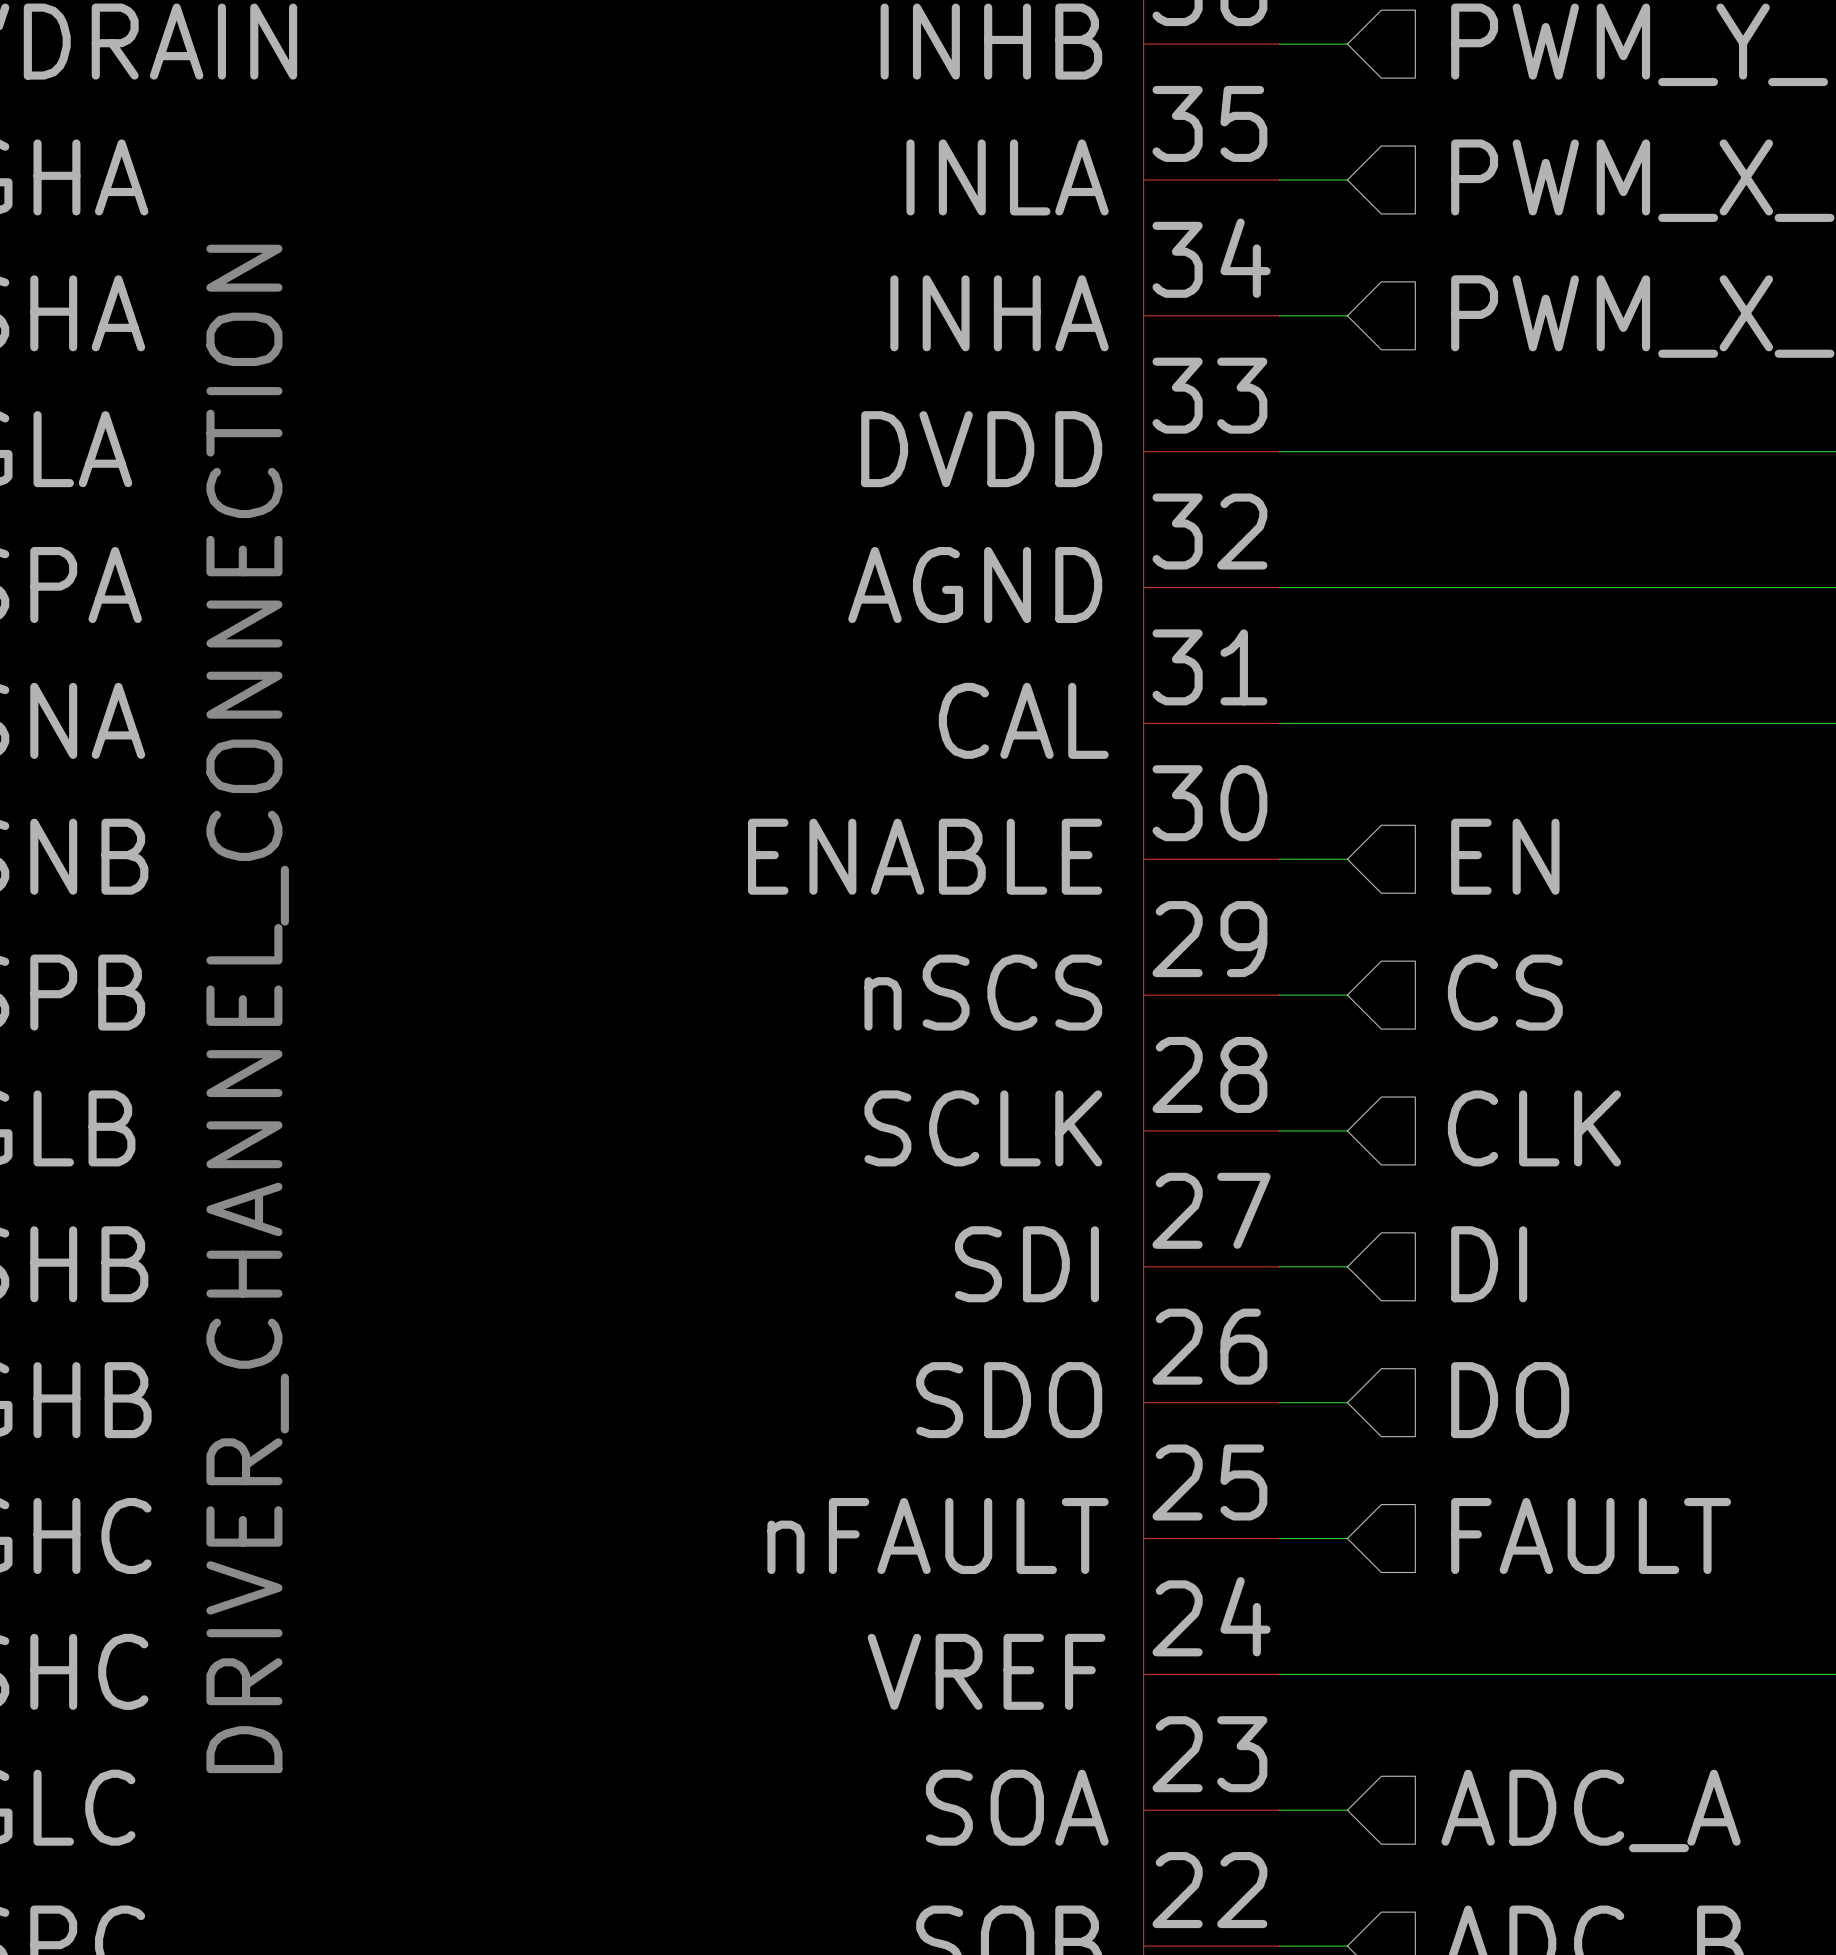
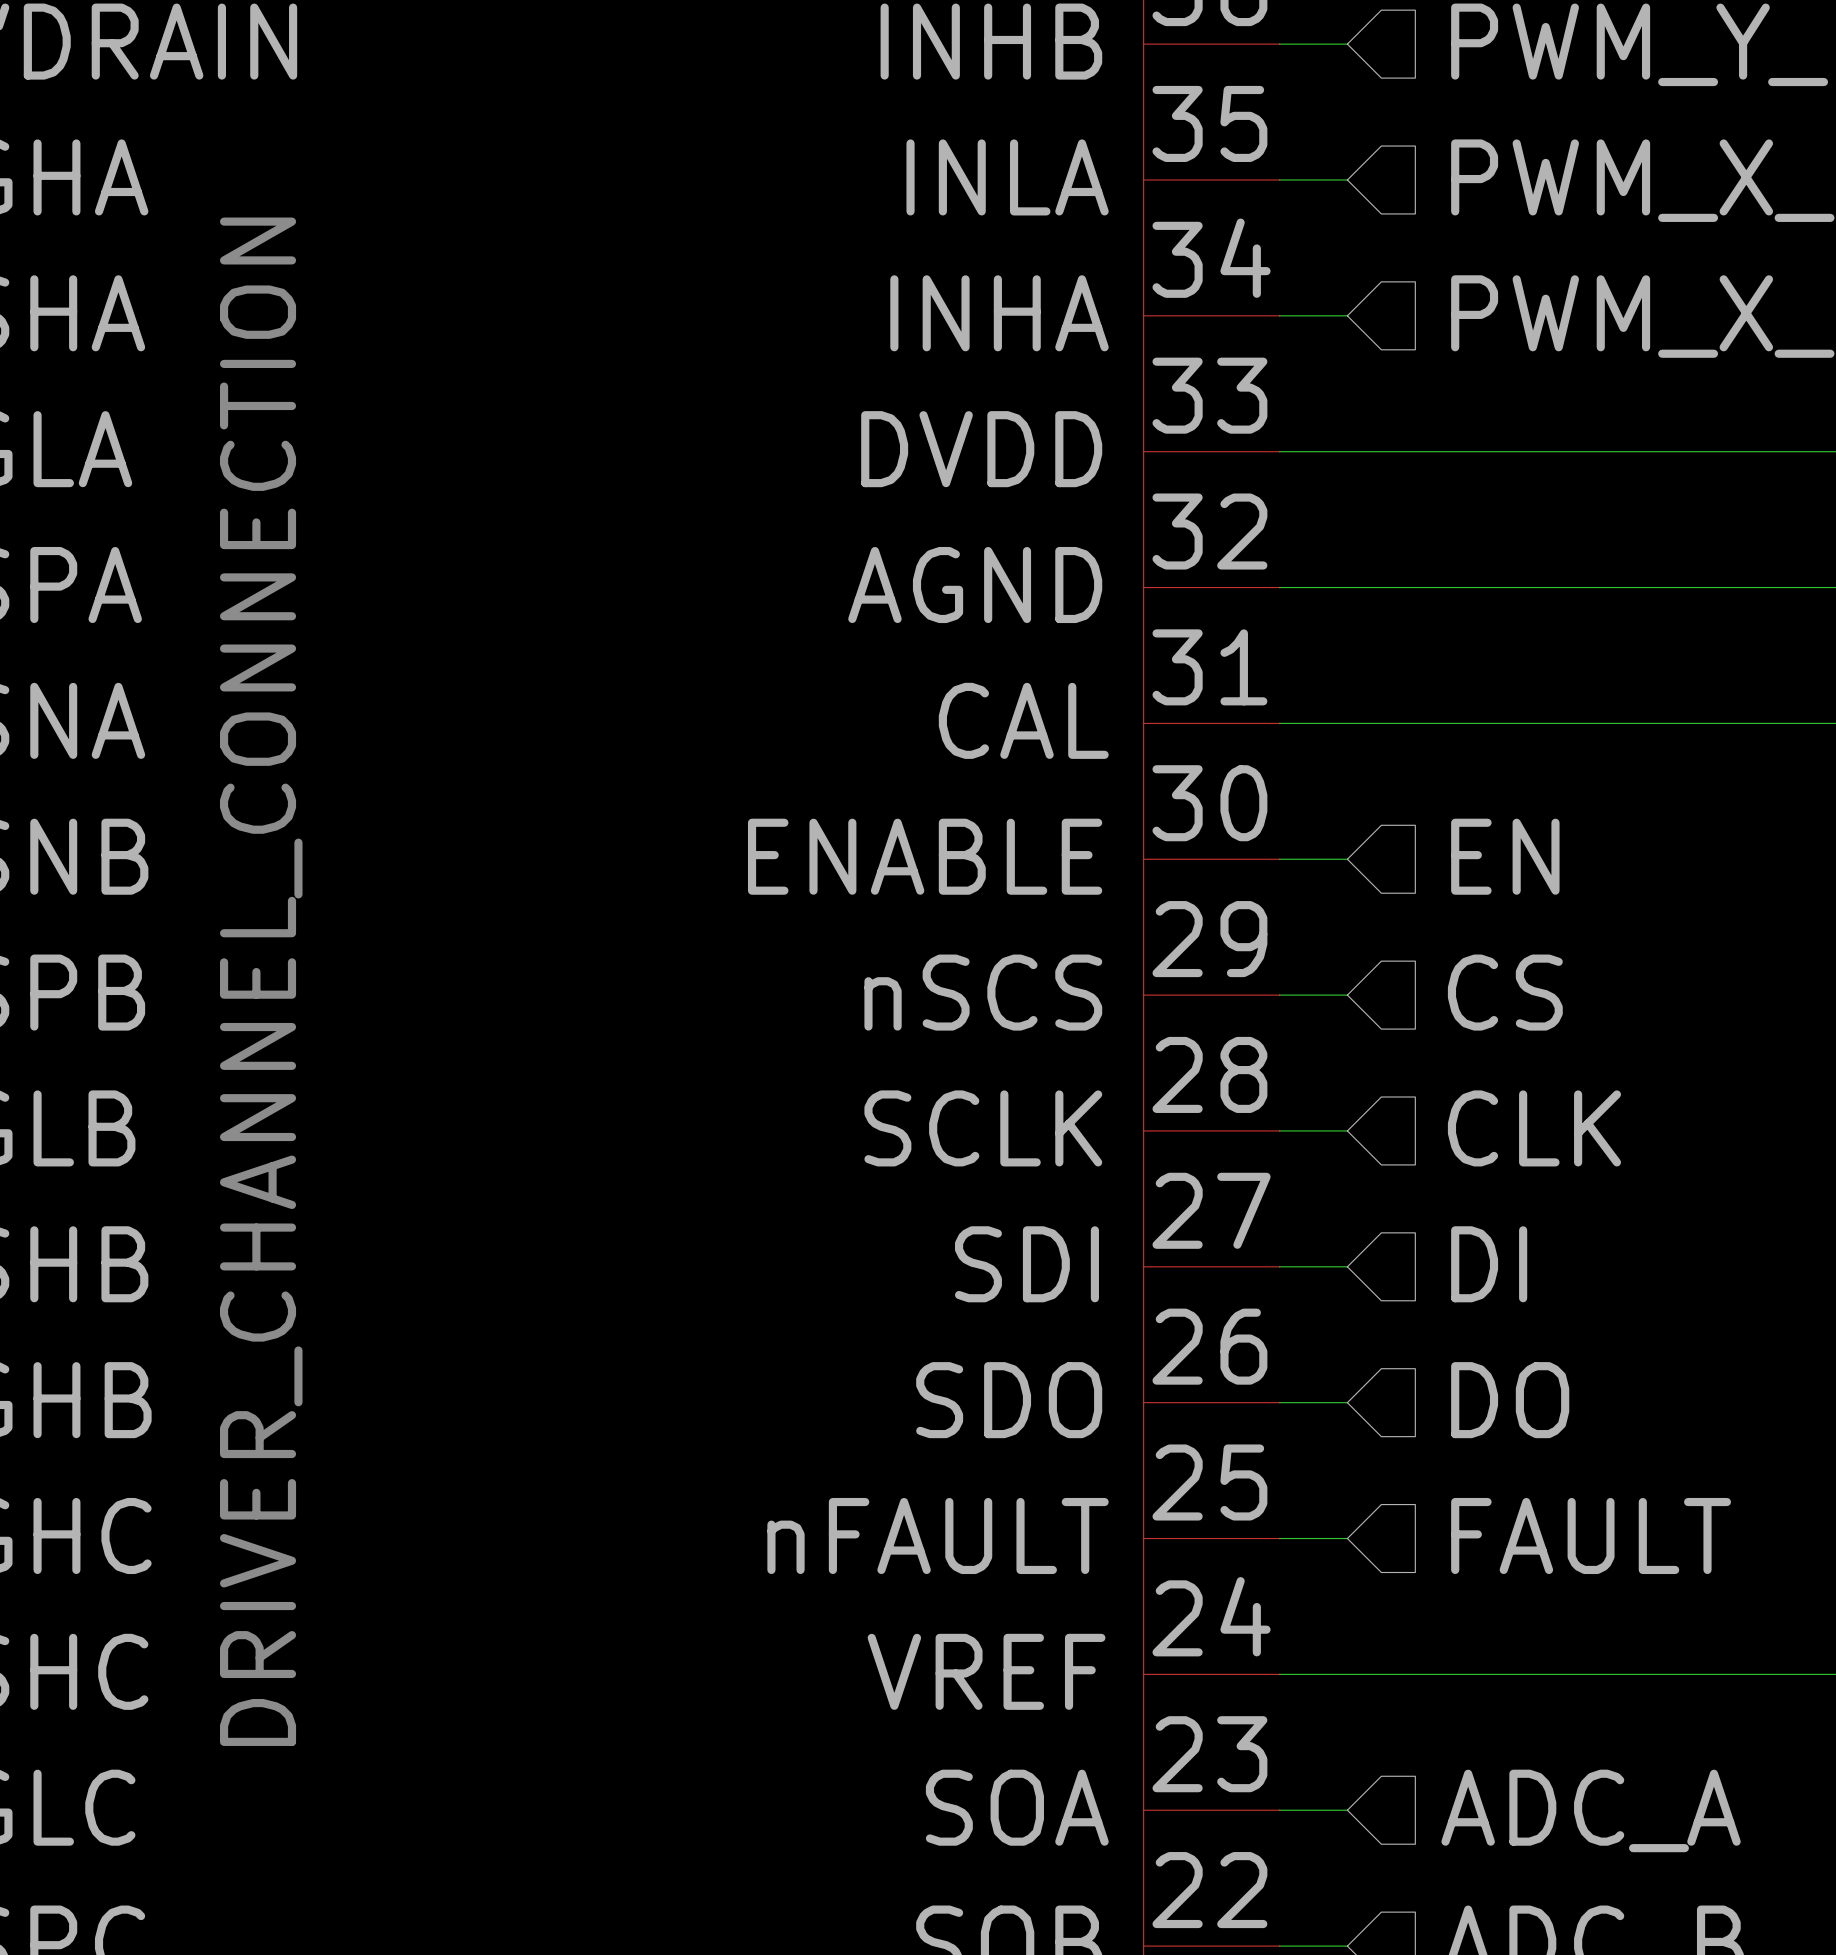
text position: DRIVER_CHANNEL_CONNECTION (247, 1008) -> DRIVER_CHANNEL_CONNECTION (261, 981)

